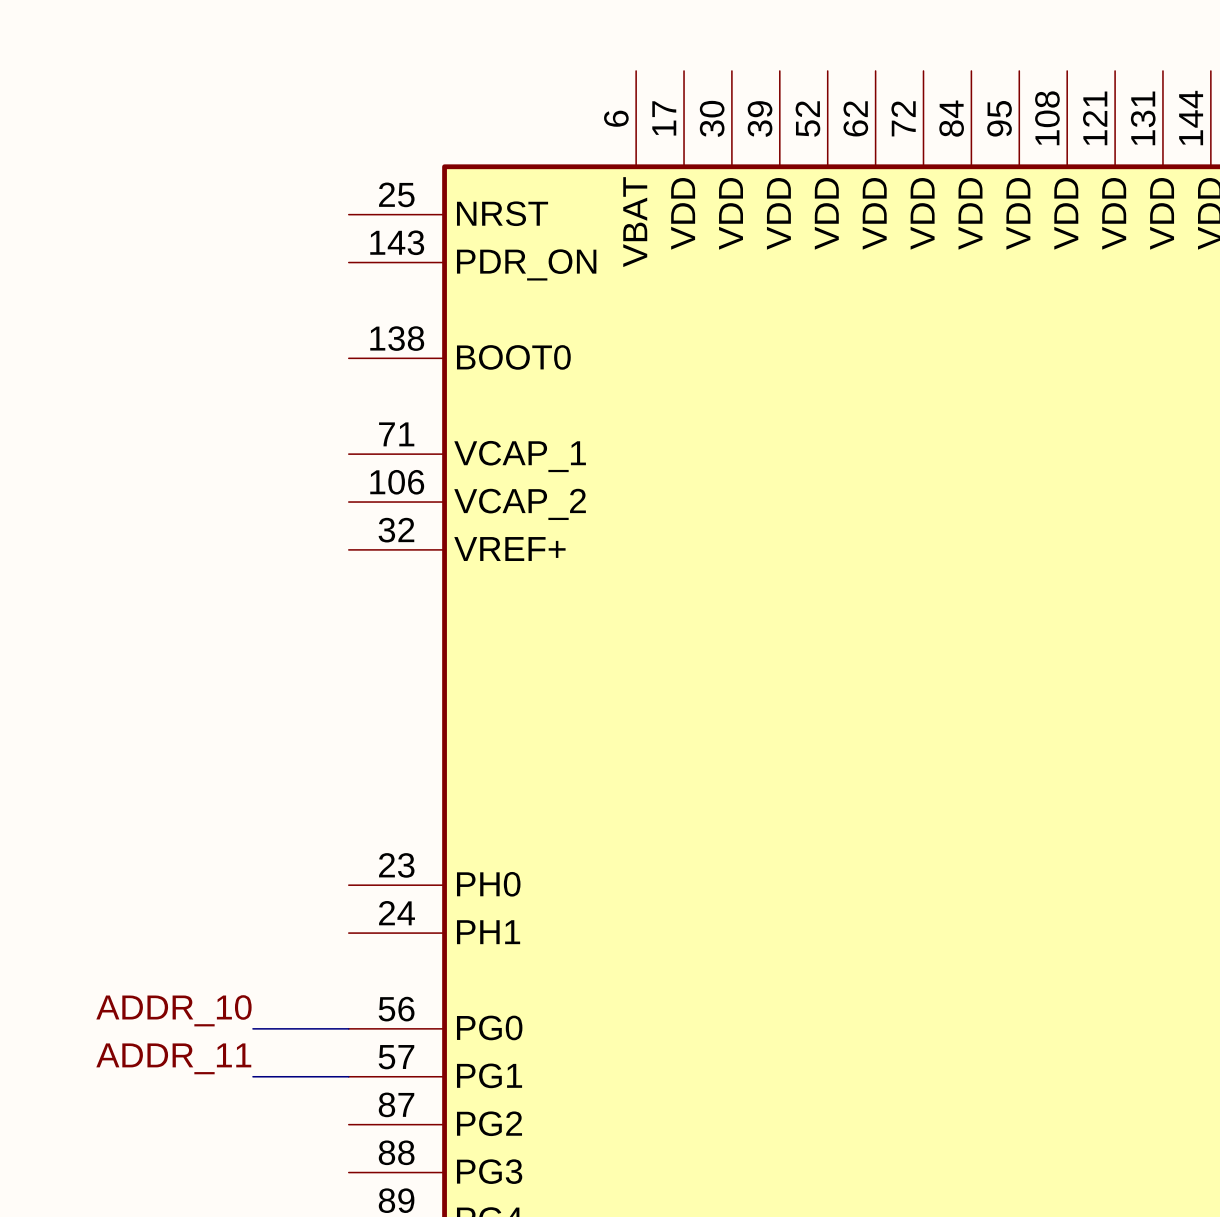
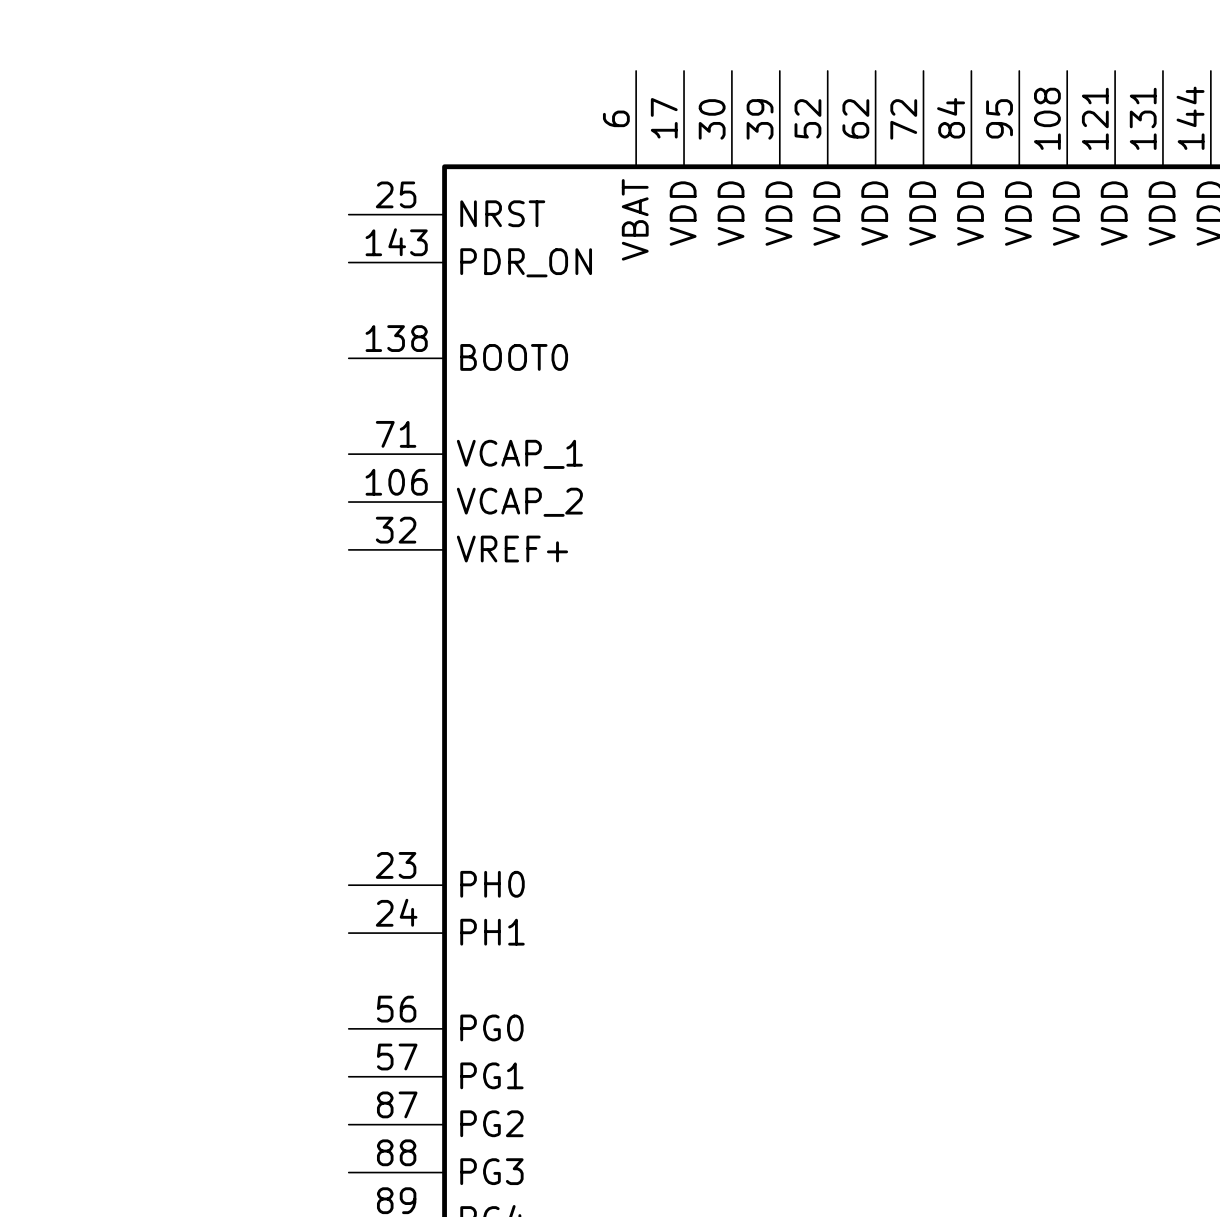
label: ADDR_10 (173, 1010) -> none
wire: (252, 1028) (348, 1028) -> none
label: ADDR_11 (173, 1058) -> none
wire: (252, 1076) (348, 1076) -> none

